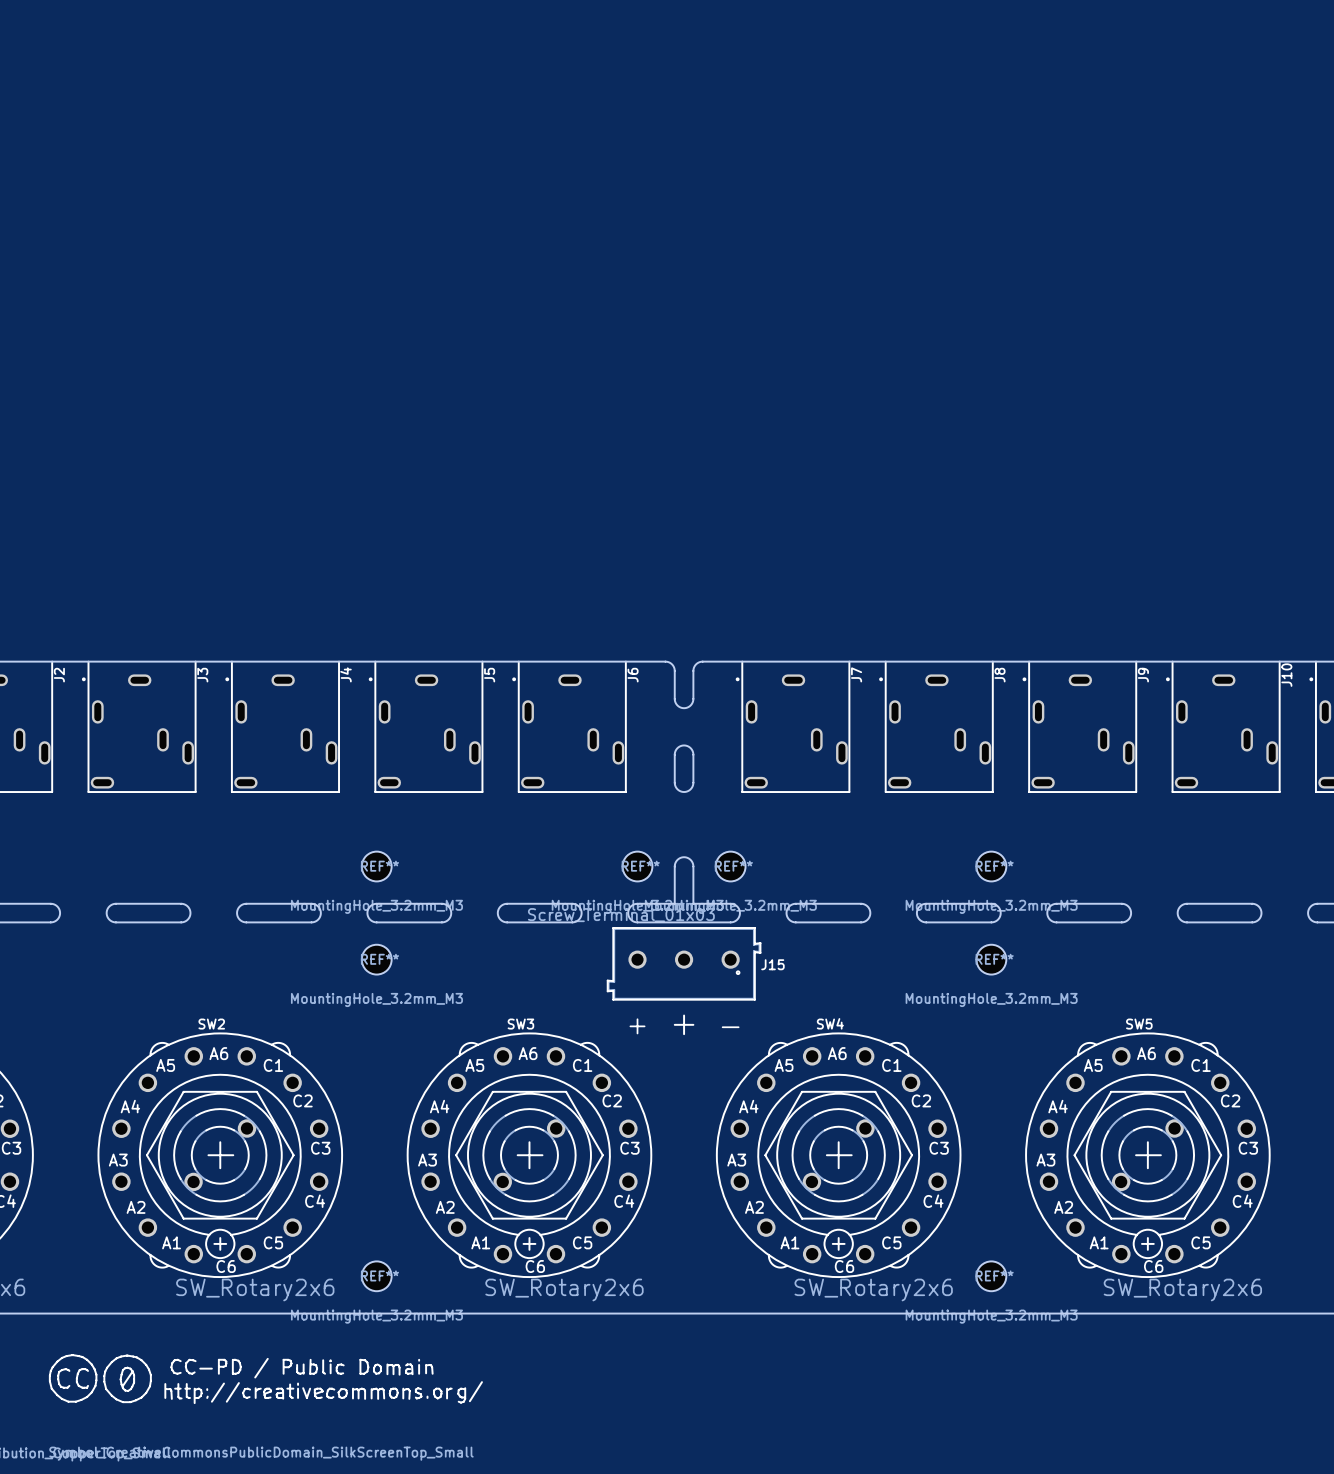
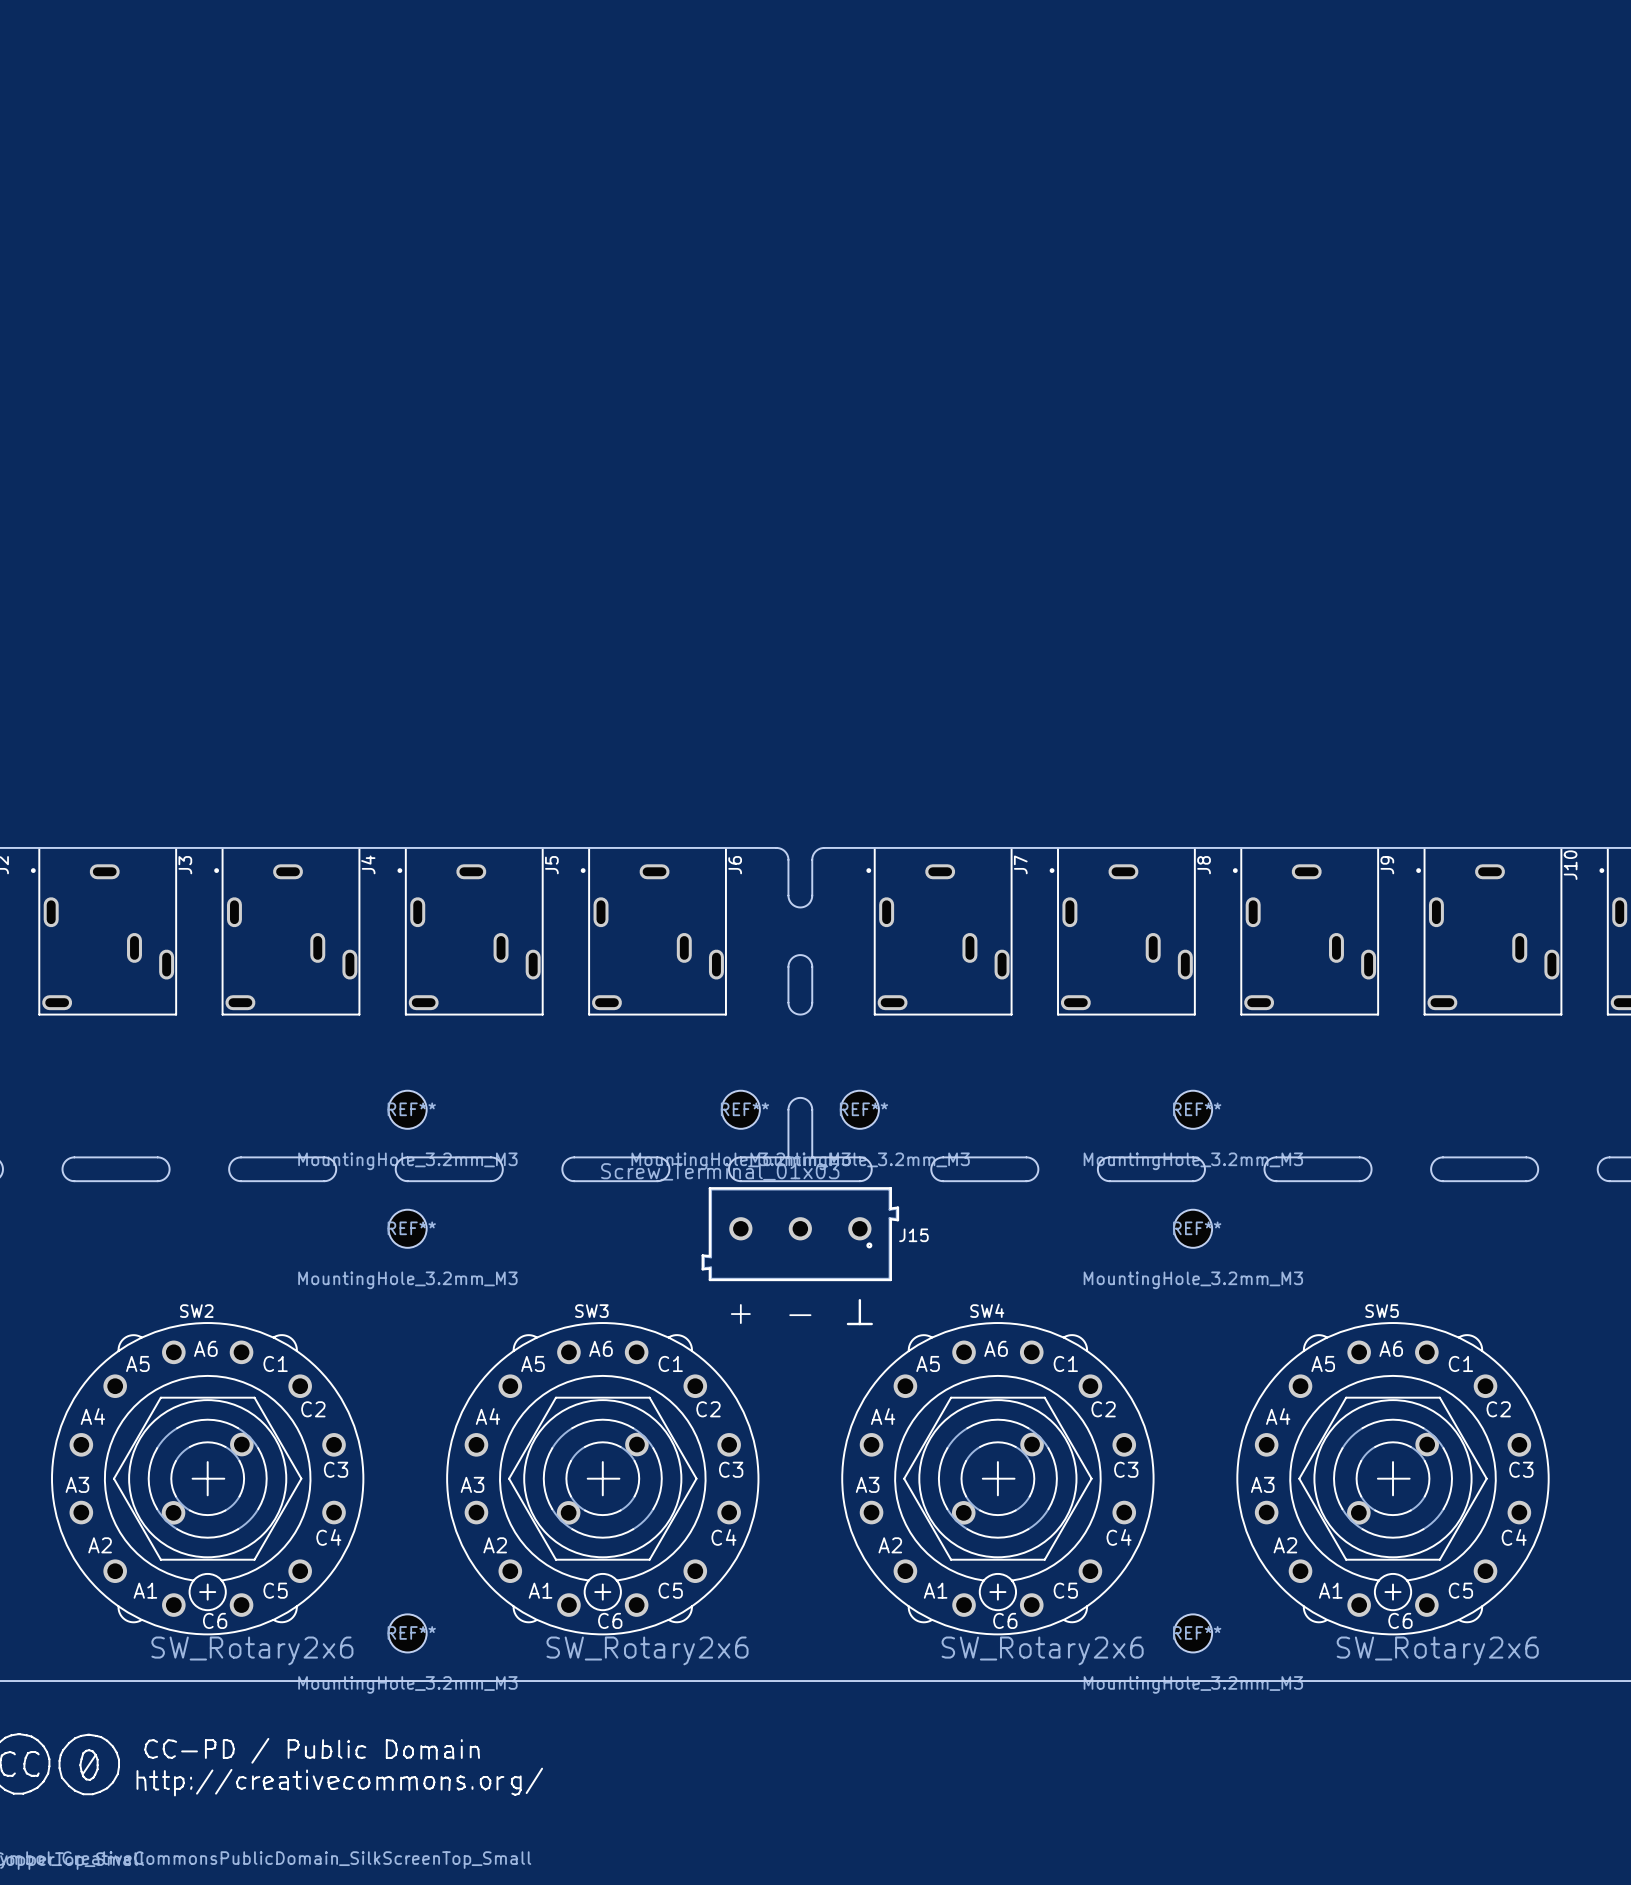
line: (684, 1015) (684, 1034) -> (859, 1300) (859, 1323)
line: (674, 1024) (693, 1024) -> (847, 1323) (871, 1323)
text position: — (730, 1027) -> — (800, 1315)

